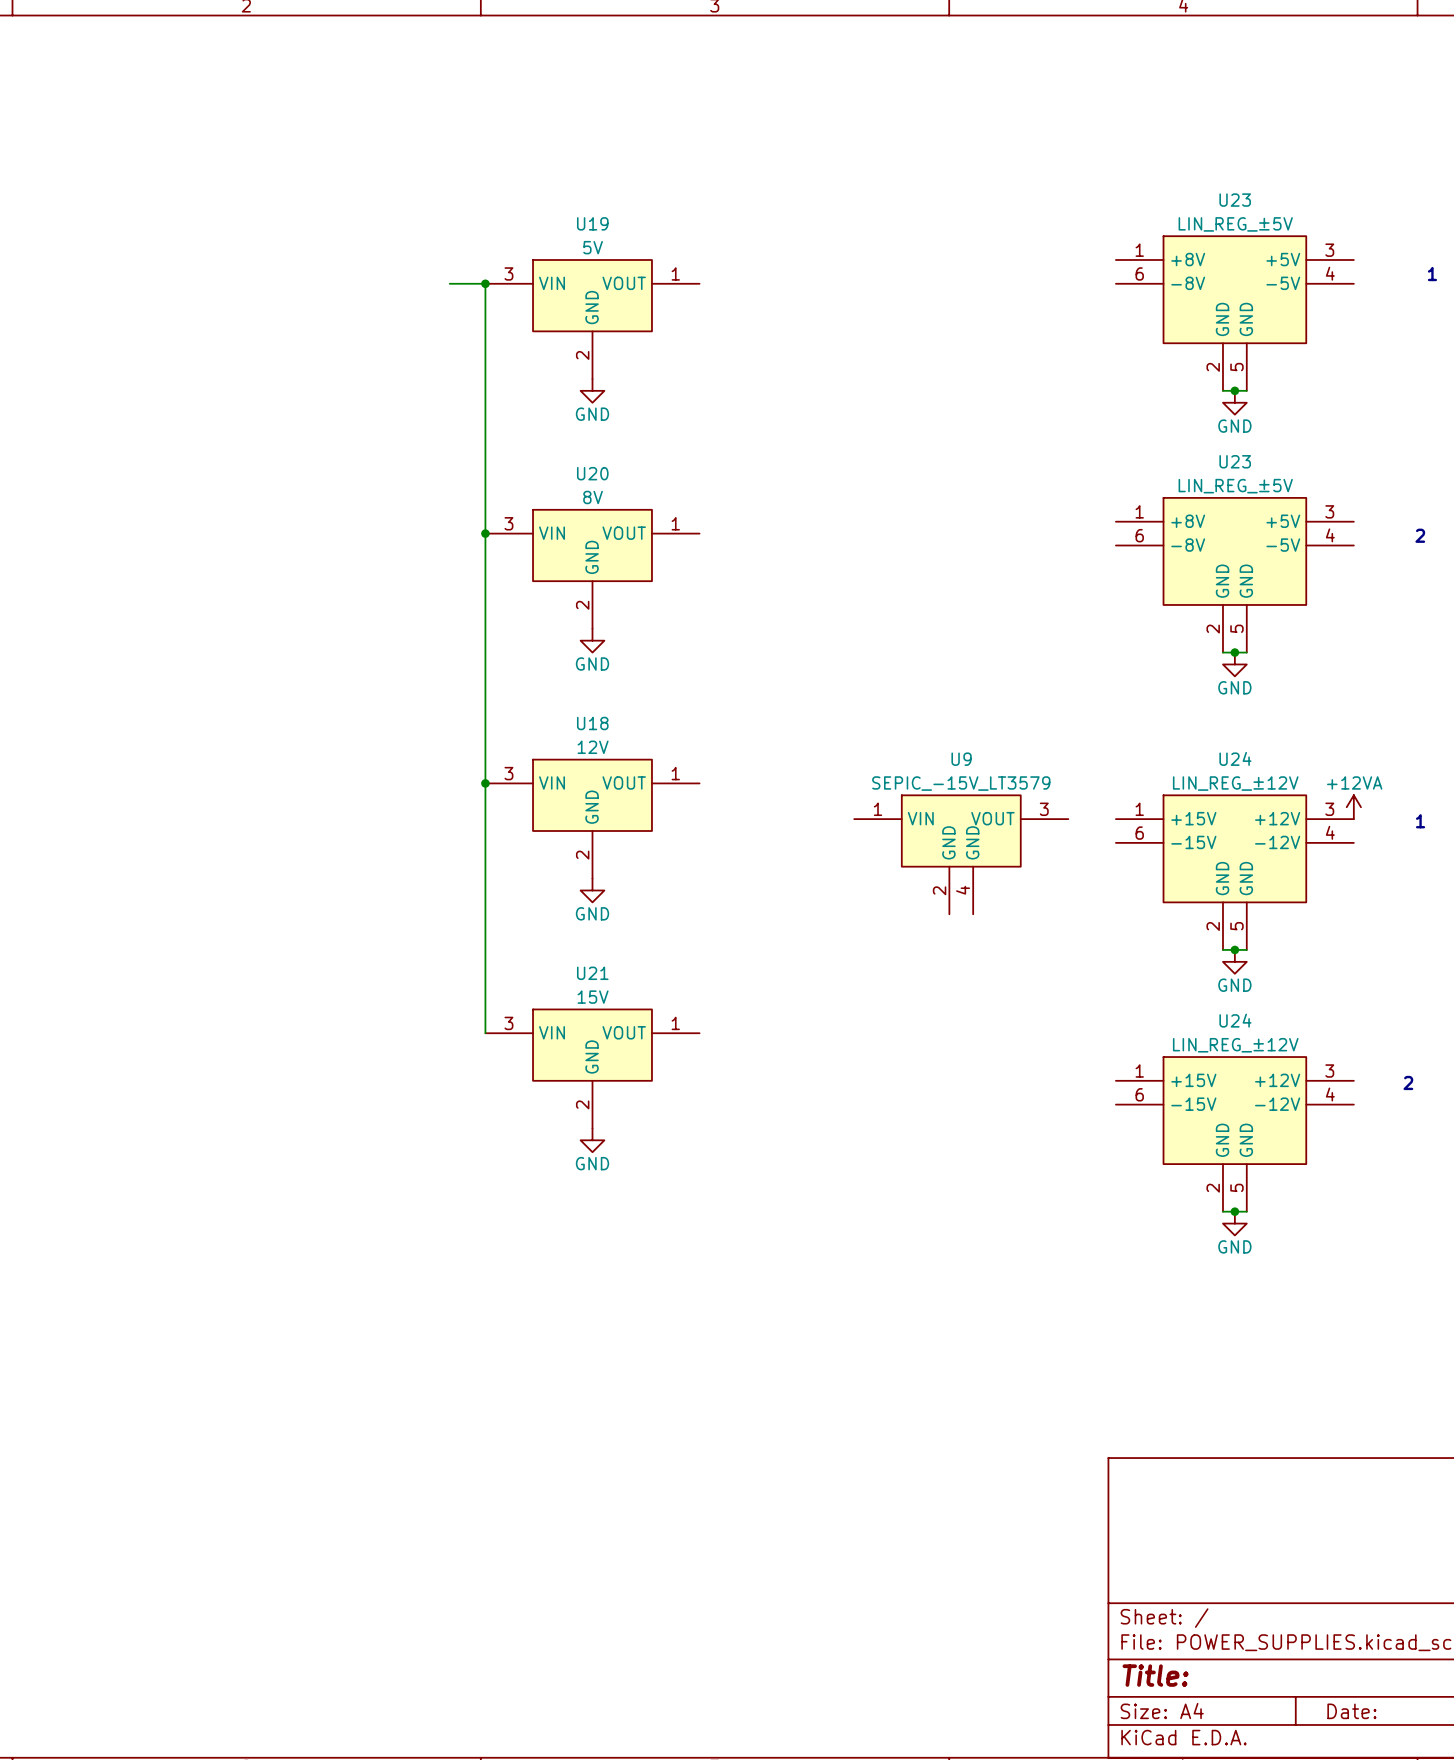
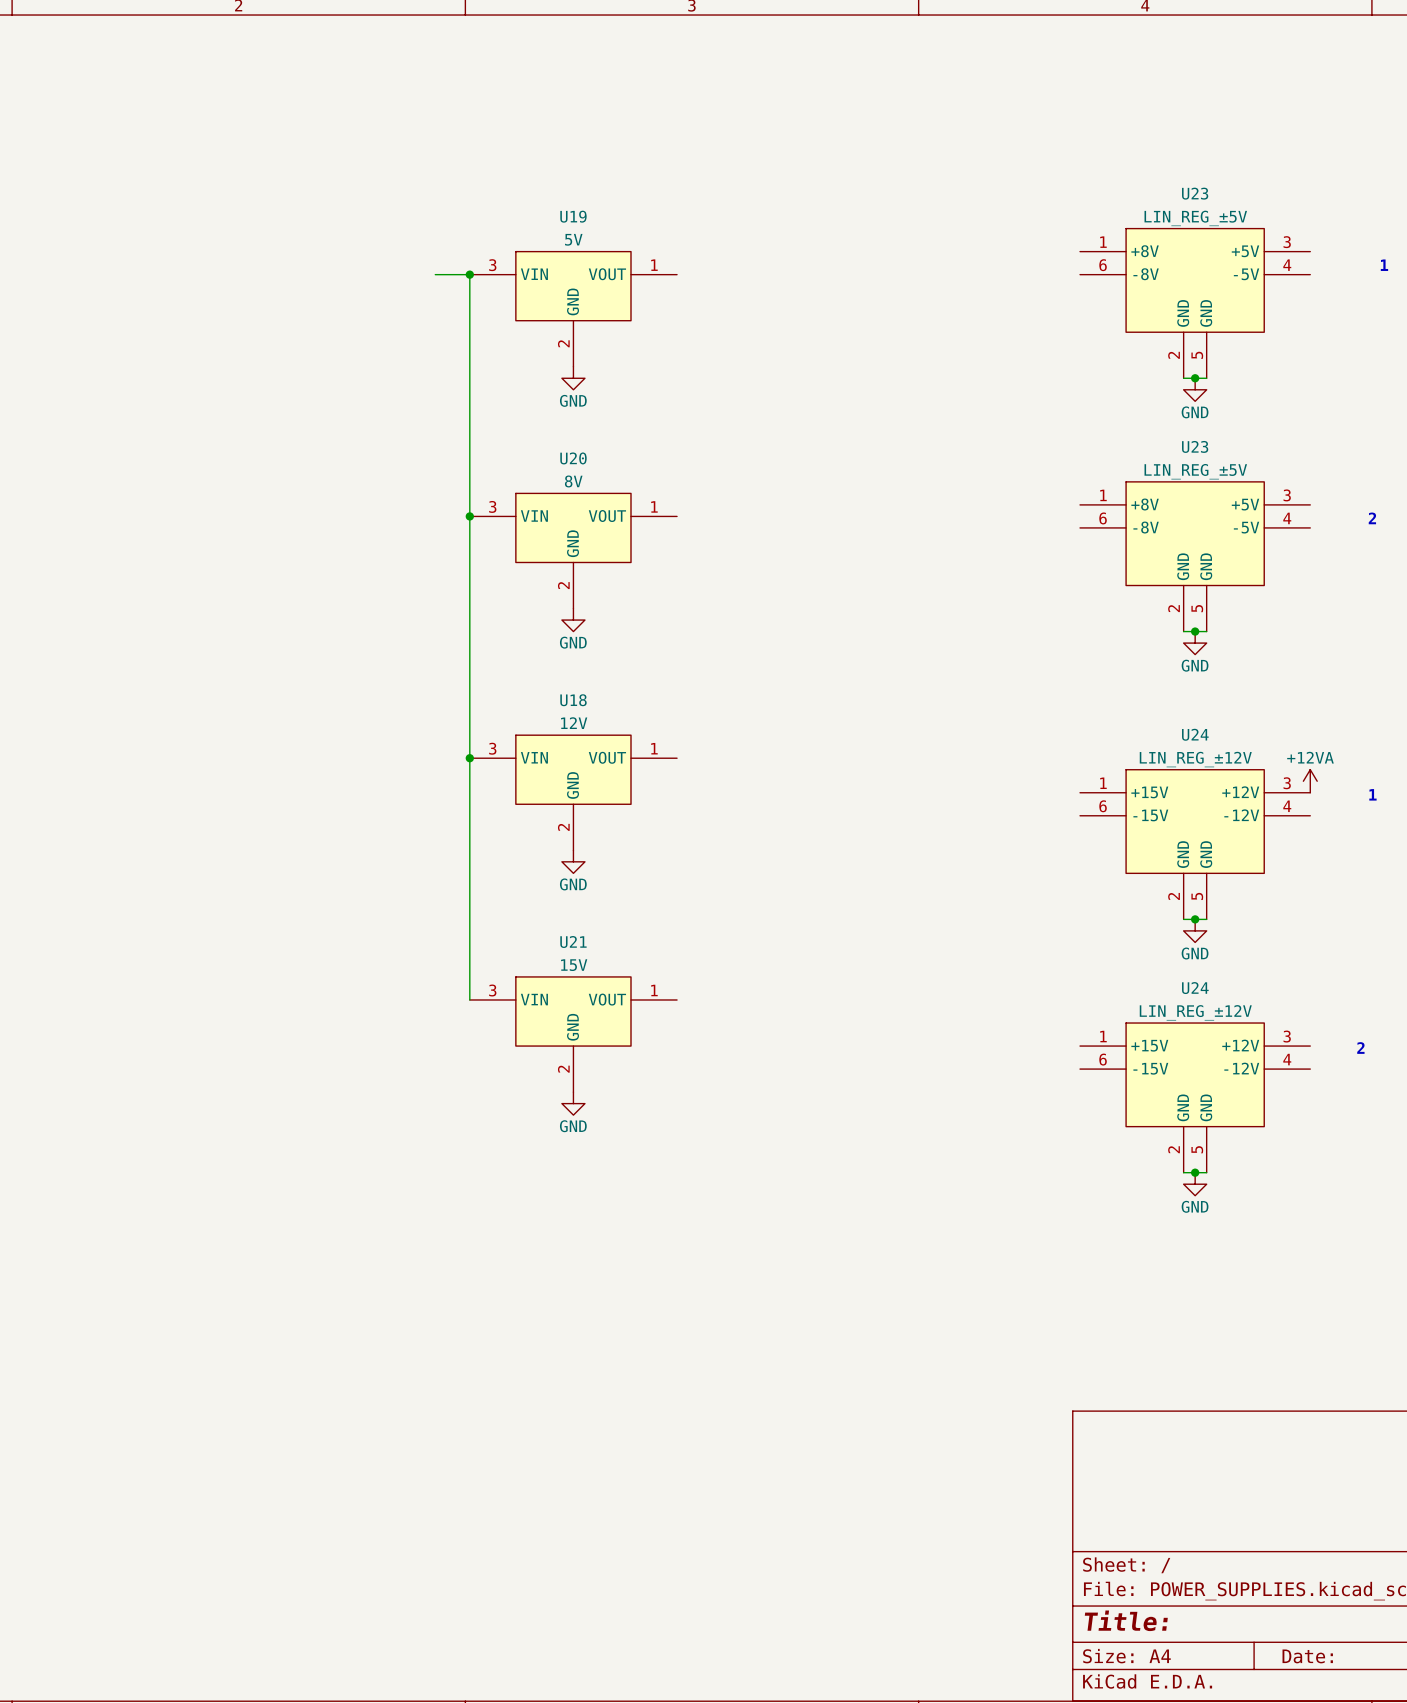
U9: SEPIC_-15V_LT3579 (961, 854) -> none

